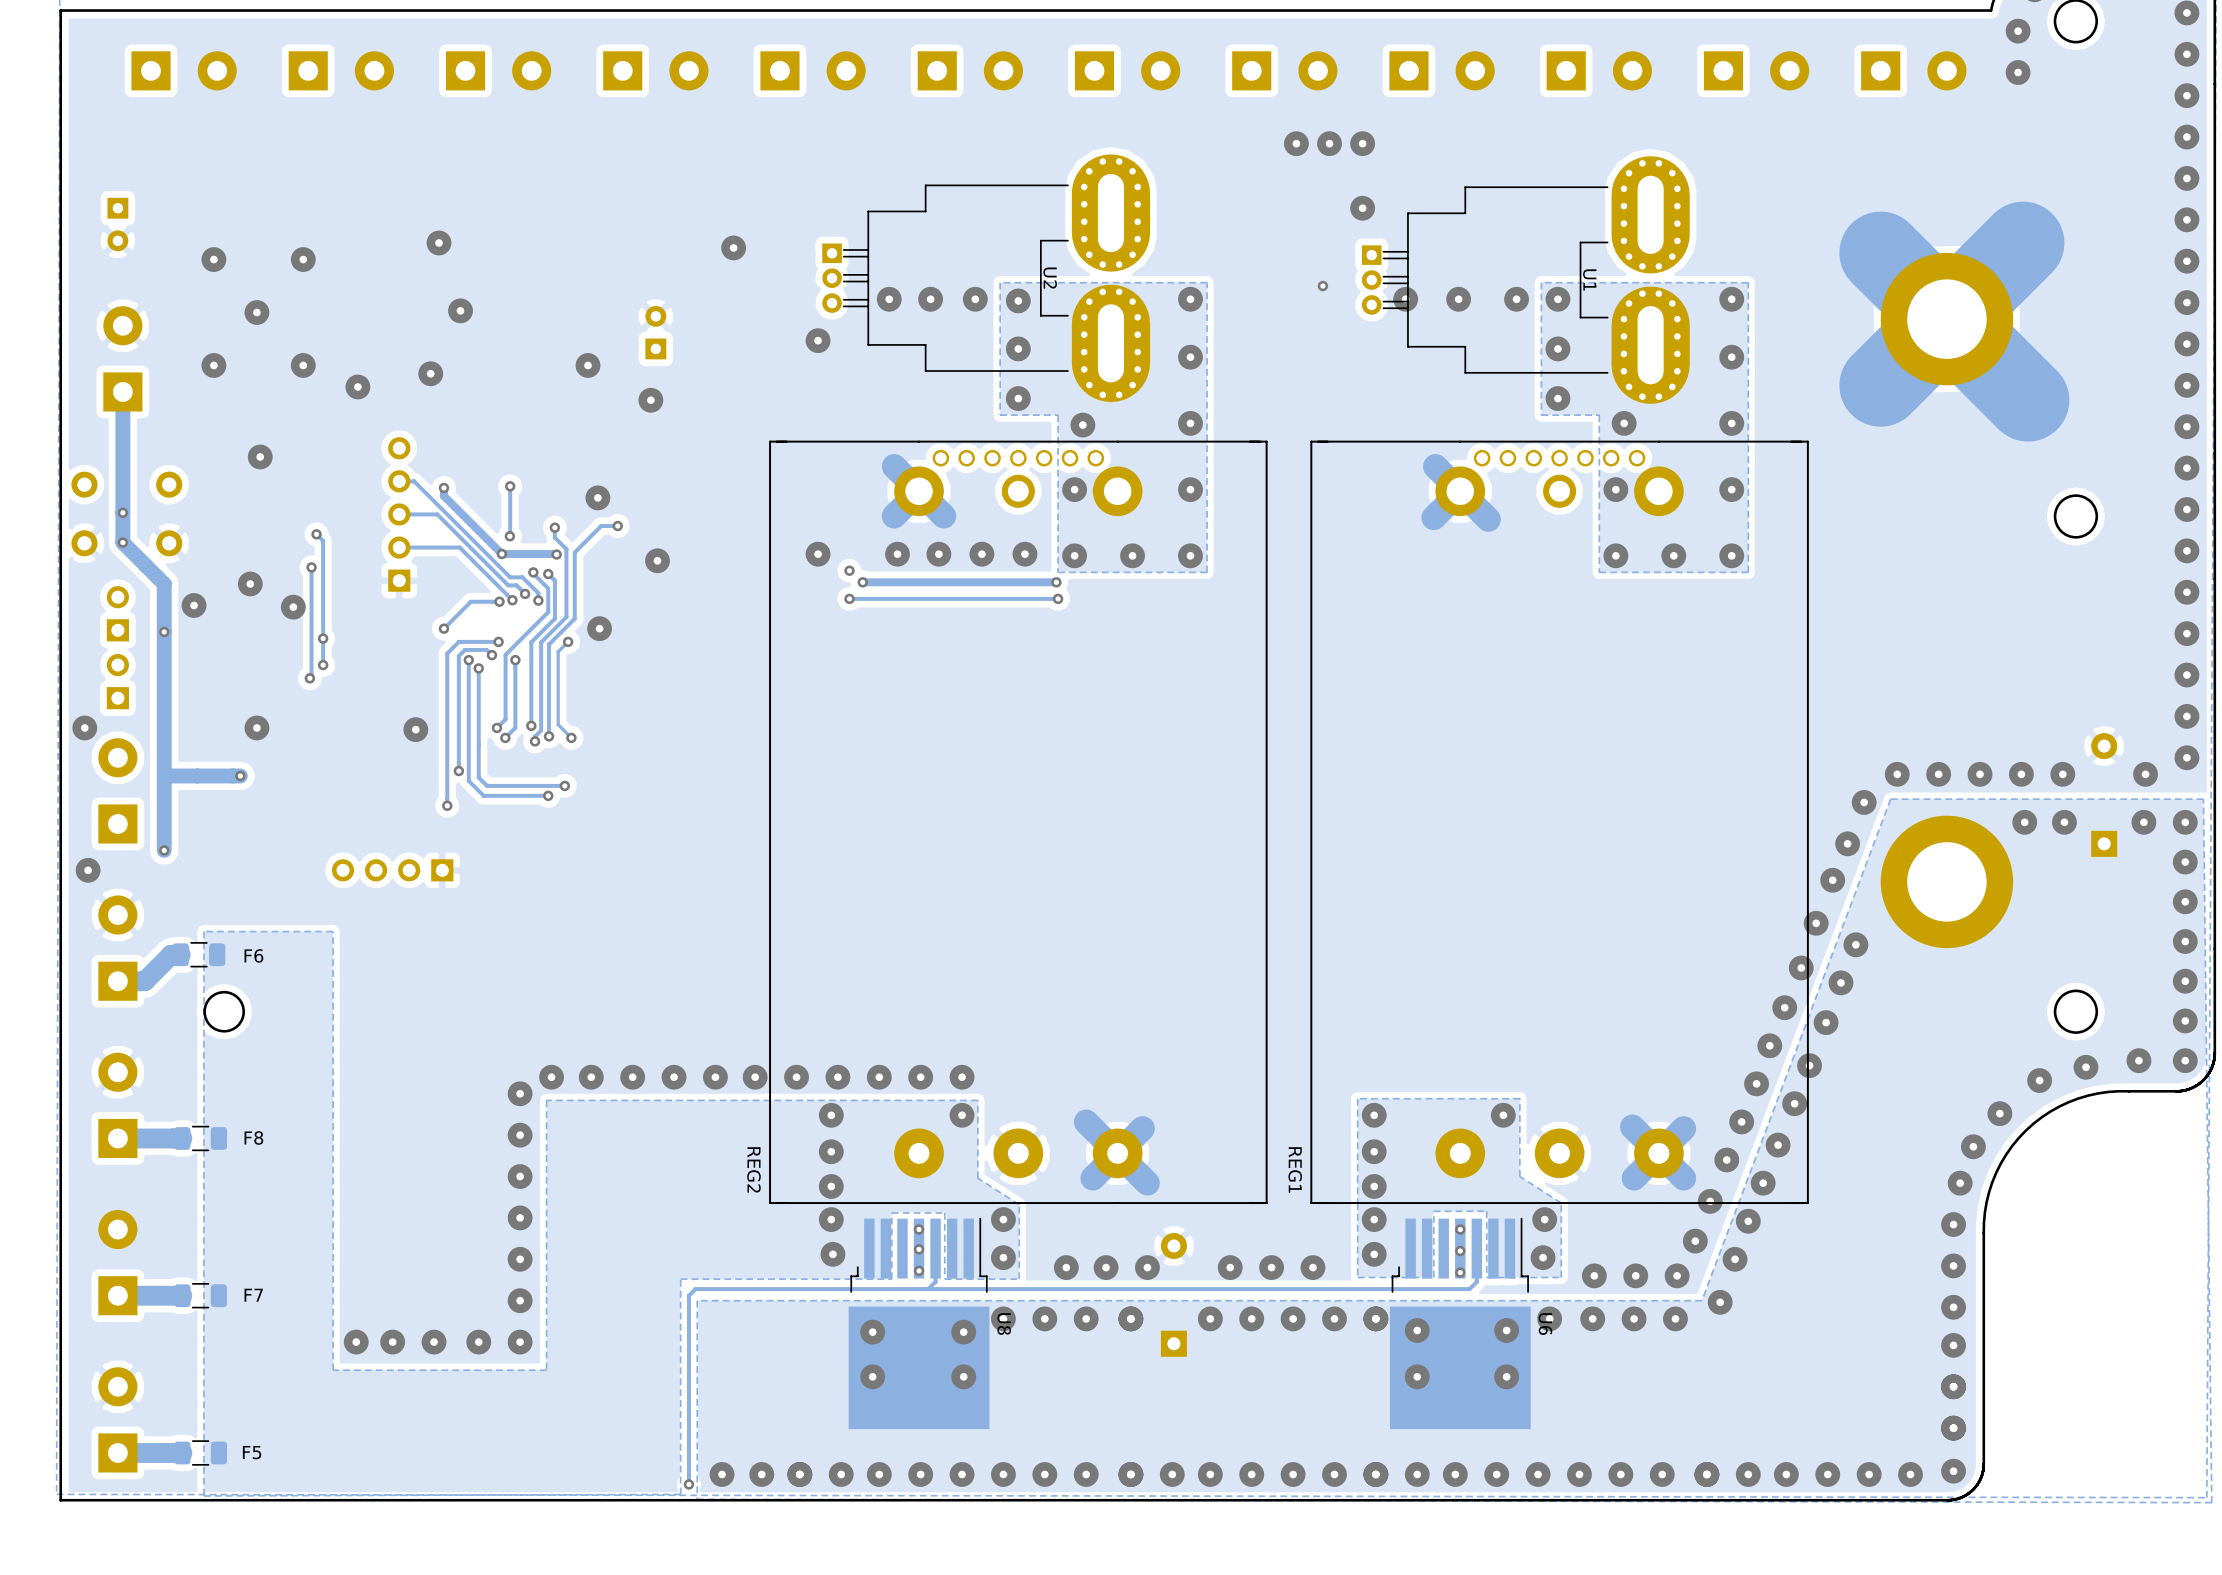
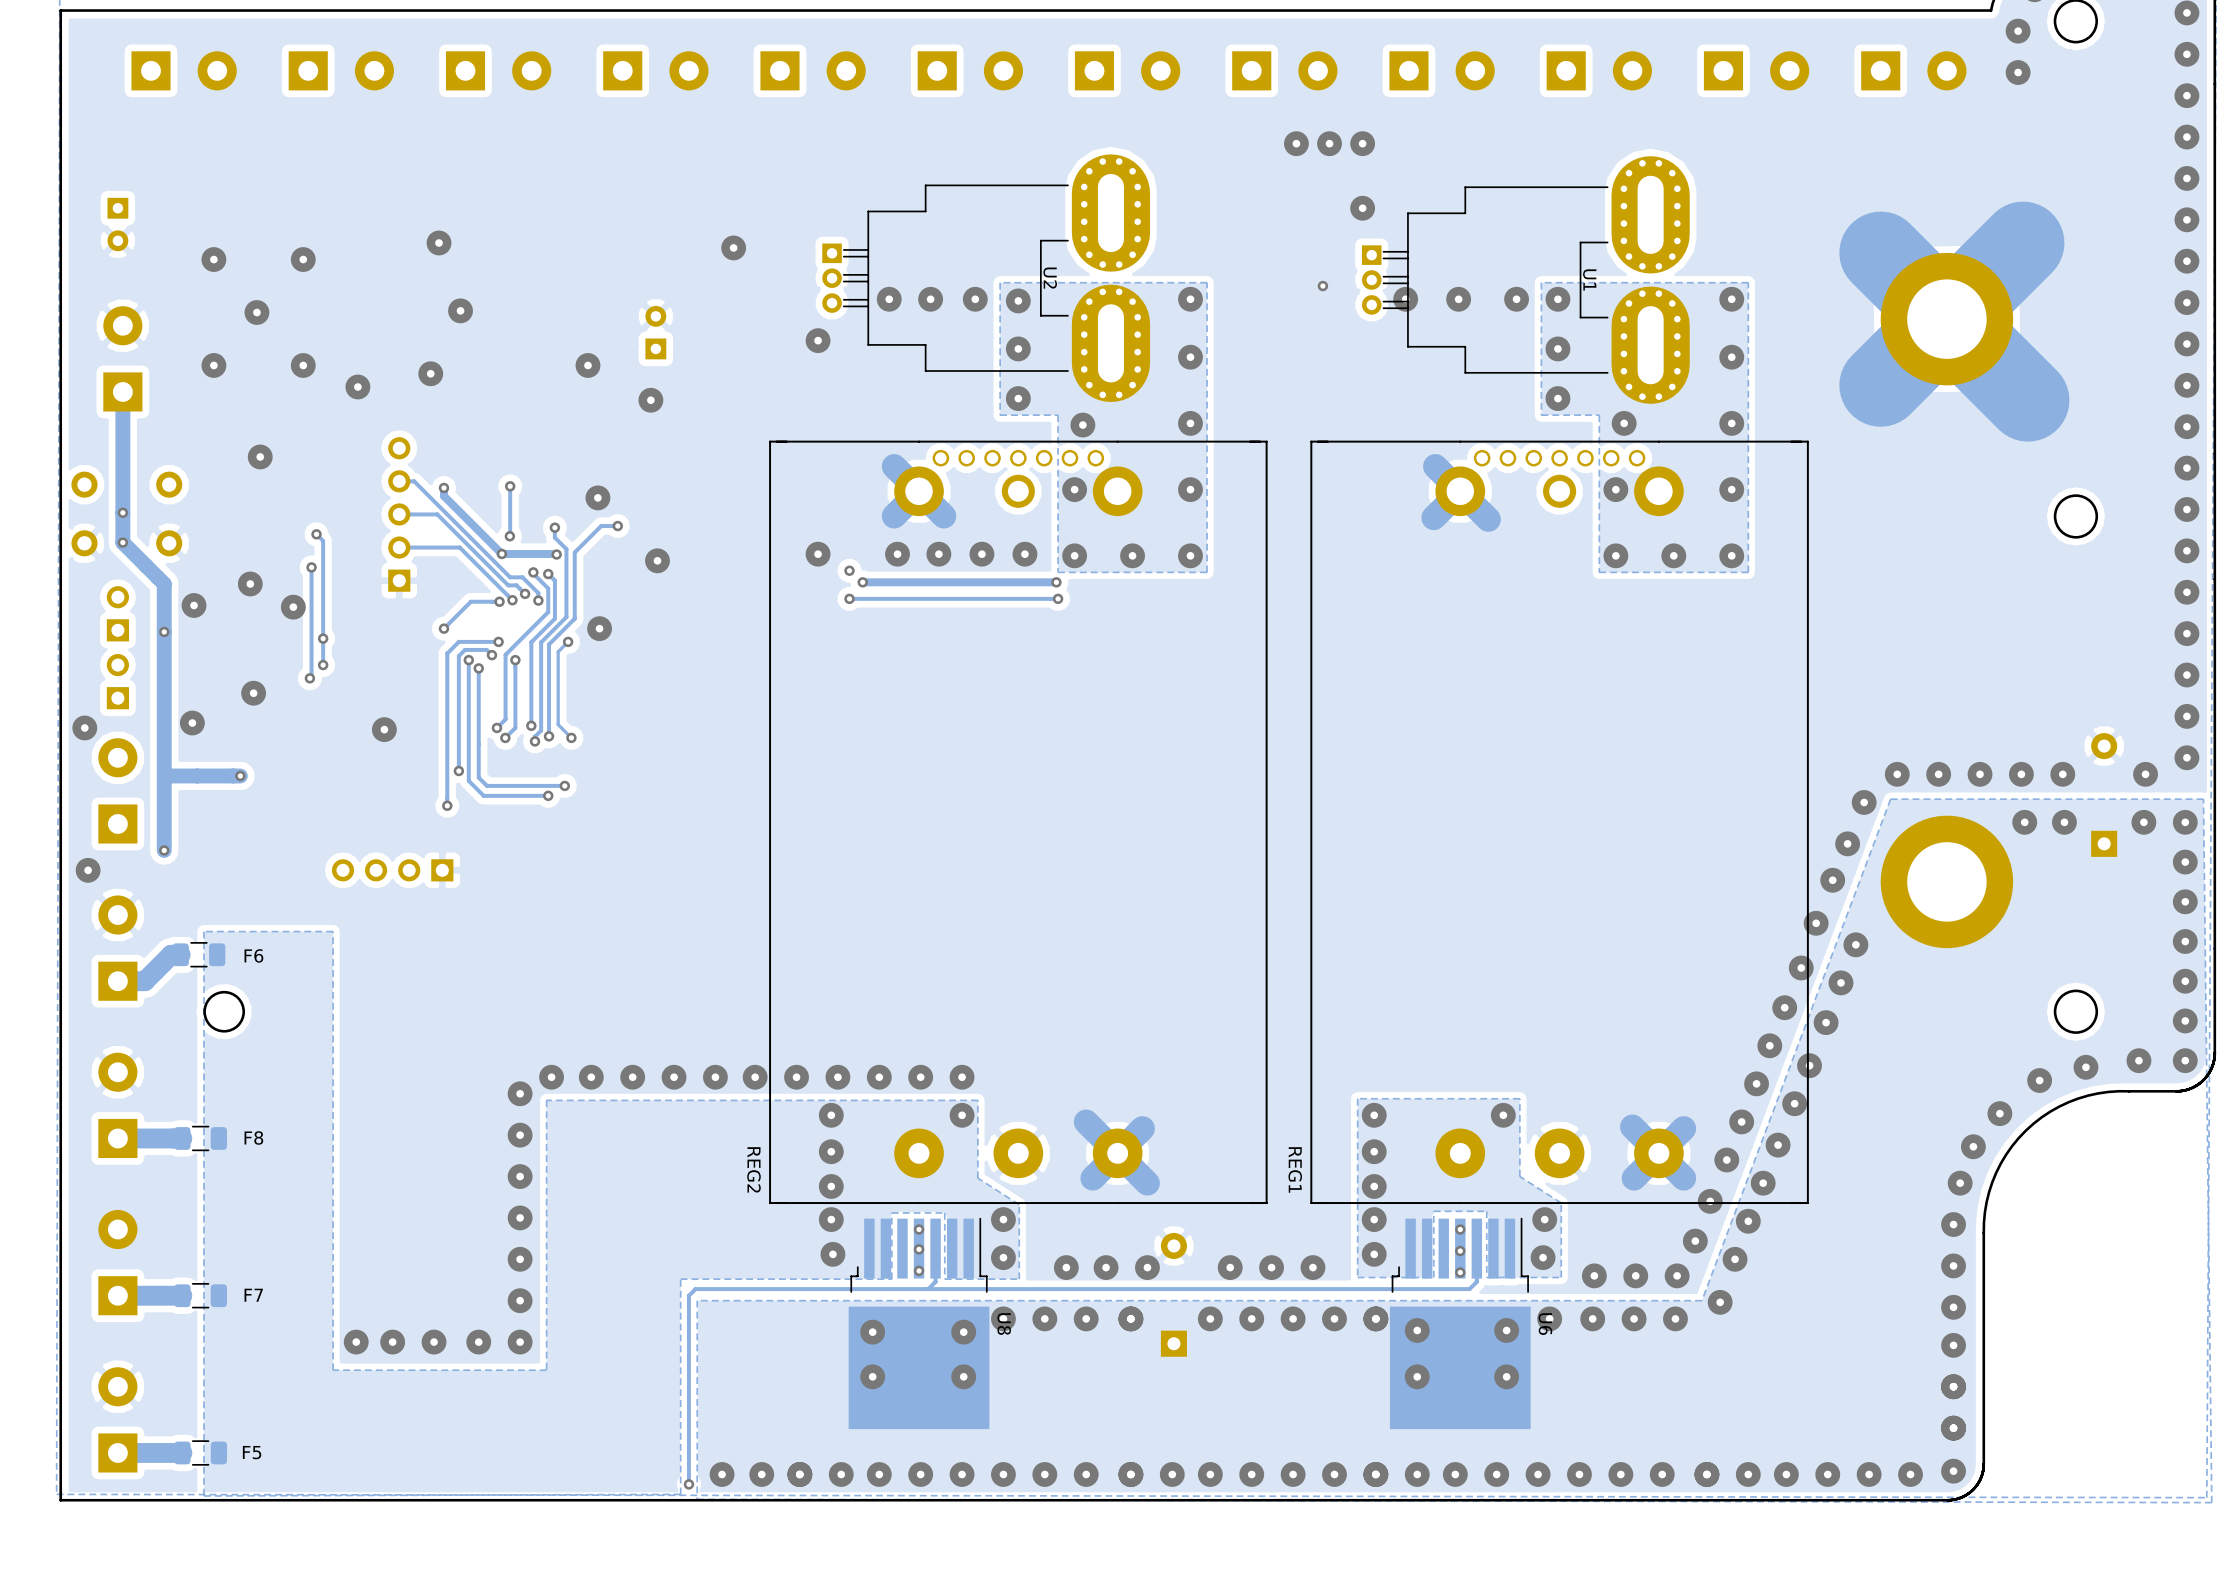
via: none -> (253, 693)
via: none -> (192, 723)
via: (256, 727) -> none
via position: (415, 729) -> (384, 729)

